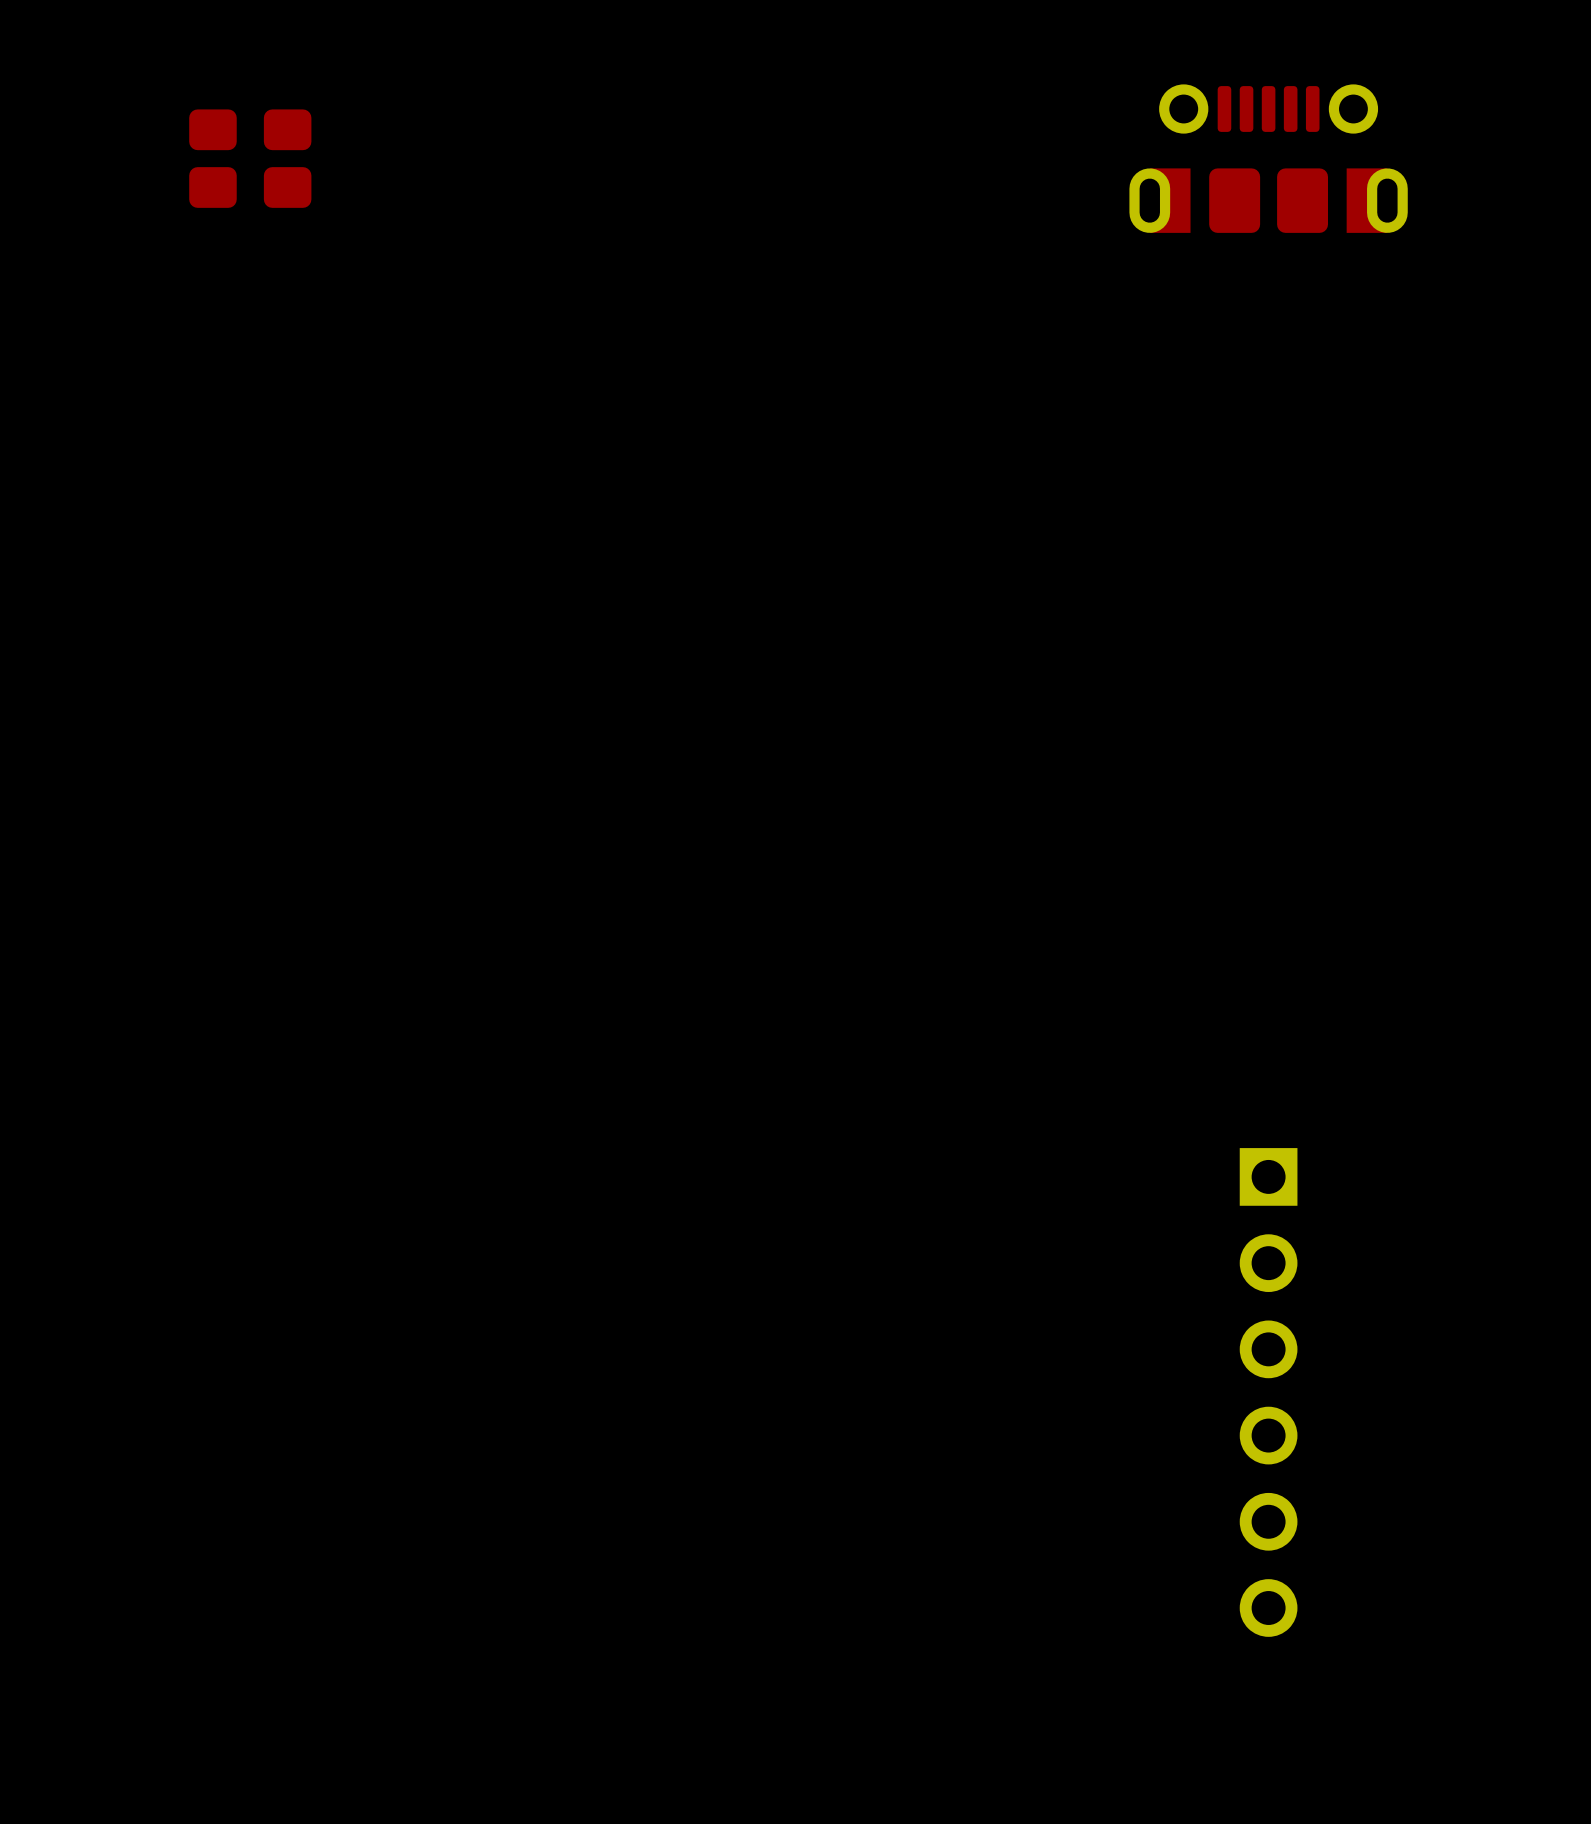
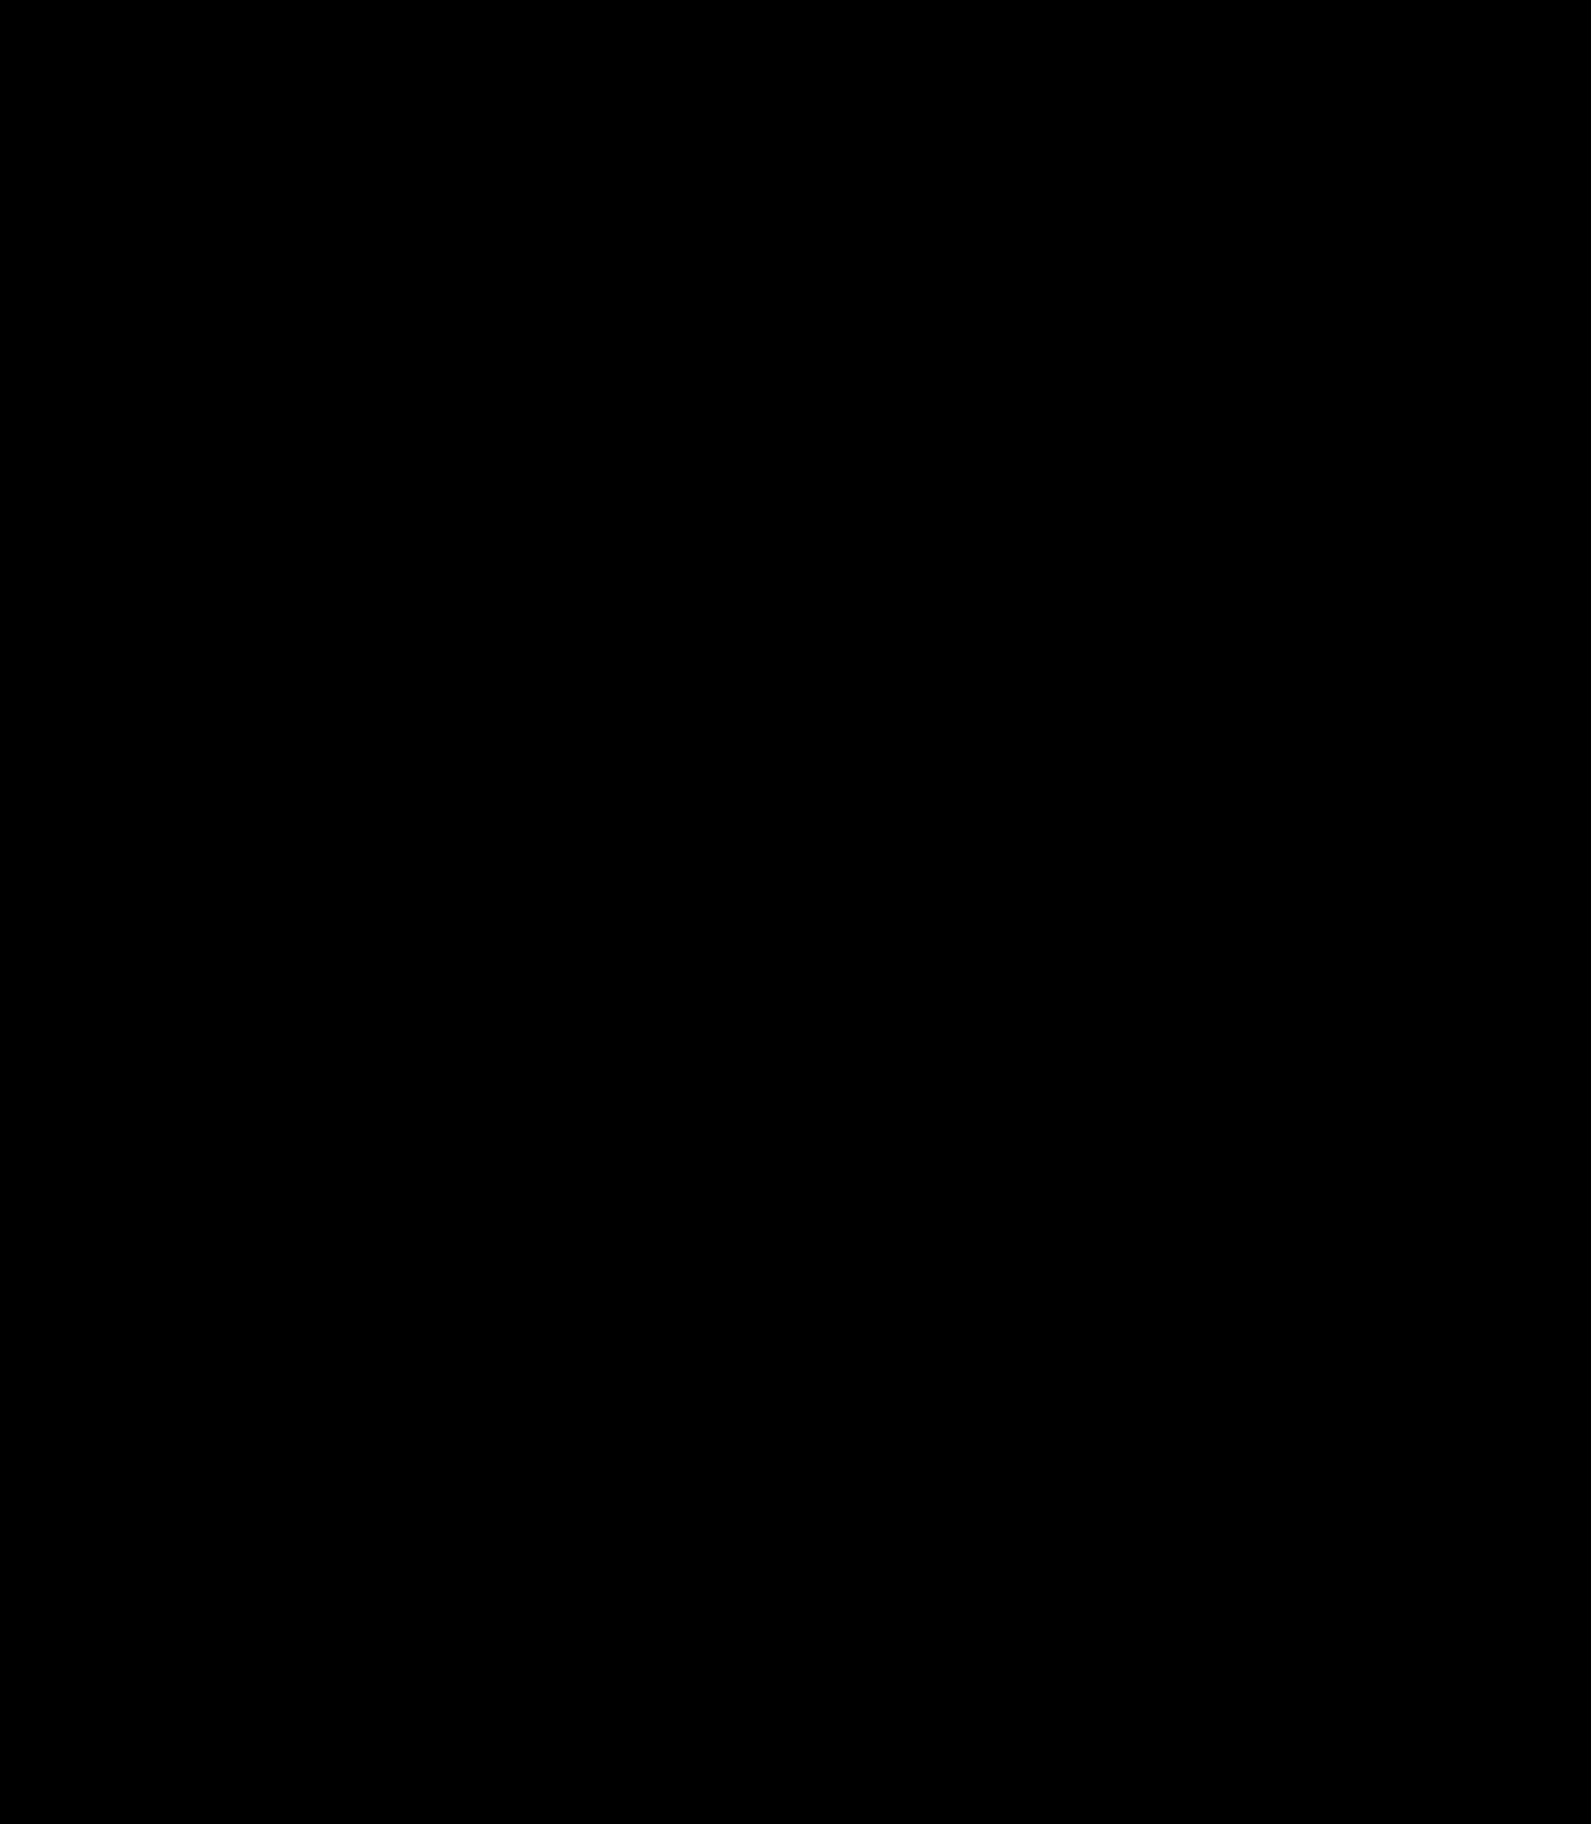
part: (250, 158) -> none
part: (1268, 158) -> none
part: (1268, 1392) -> none

